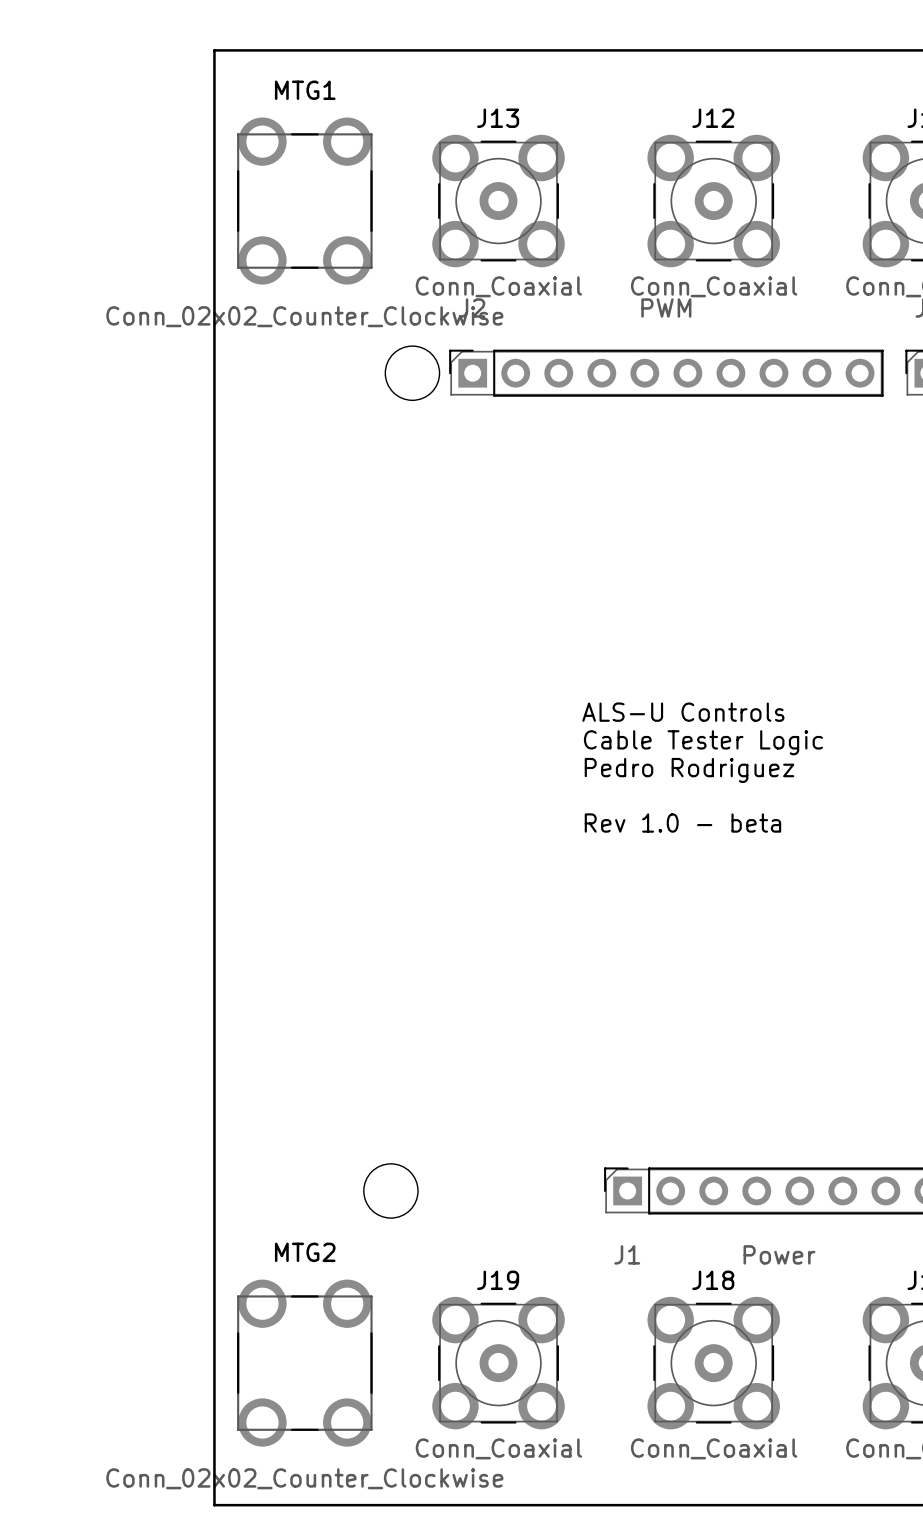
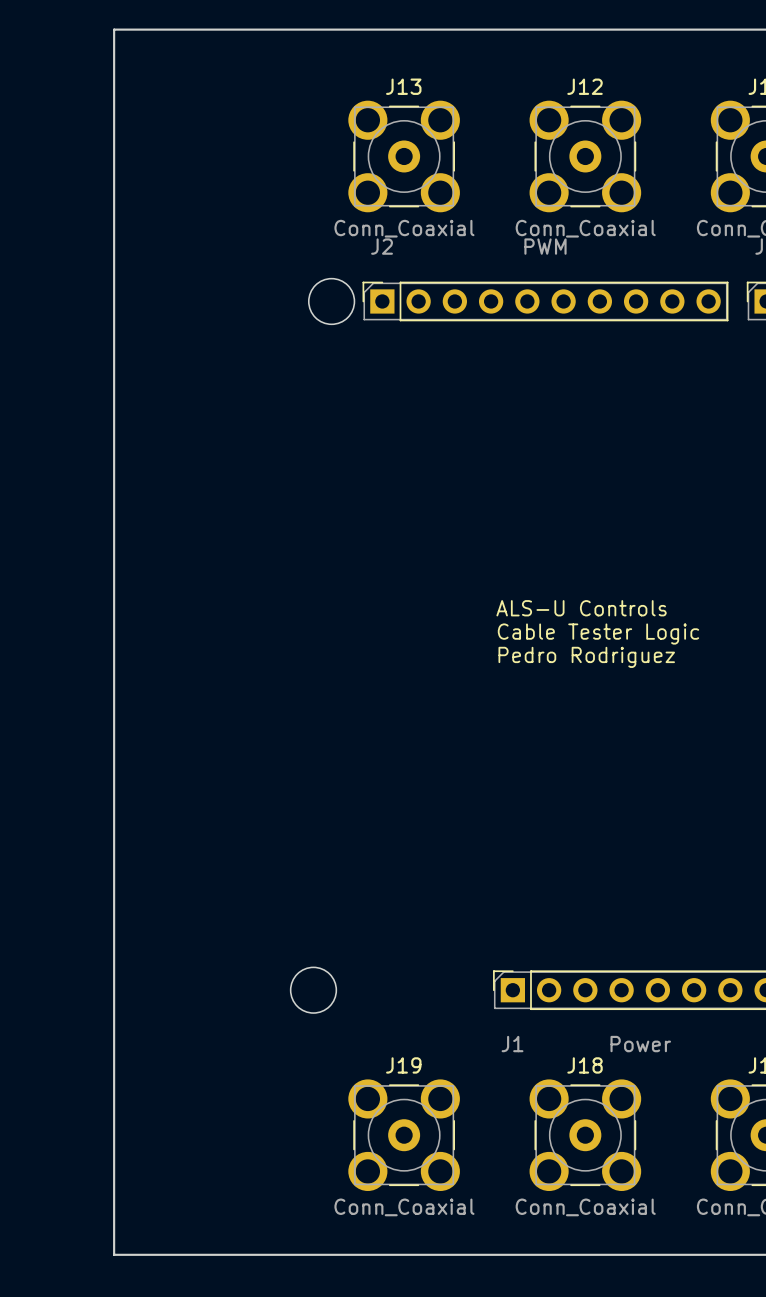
board edge: (214, 50) (214, 1505) -> (164, 29) (114, 29) (114, 1254) (164, 1254)
MTG1: Conn_02x02_Counter_Clockwise (304, 201) -> none
text position: ALS-U Controls (683, 712) -> ALS-U Controls (581, 608)
text position: Cable Tester Logic (703, 742) -> Cable Tester Logic (598, 634)
text position: Pedro Rodriguez (689, 770) -> Pedro Rodriguez (586, 657)
text: Rev 1.0 - beta (682, 823) -> none
MTG2: Conn_02x02_Counter_Clockwise (304, 1363) -> none

